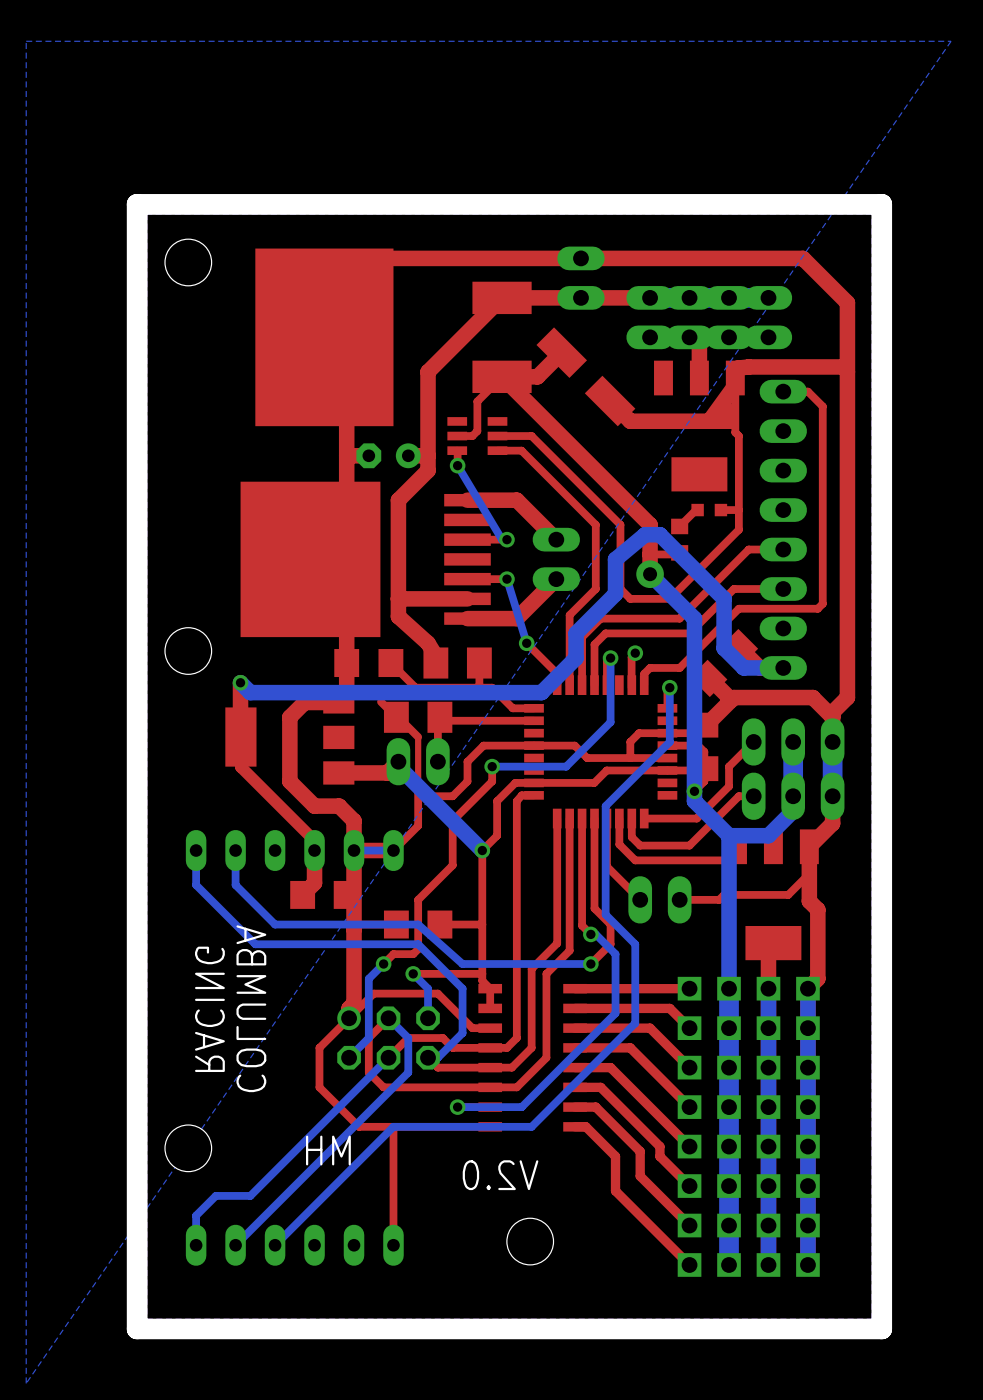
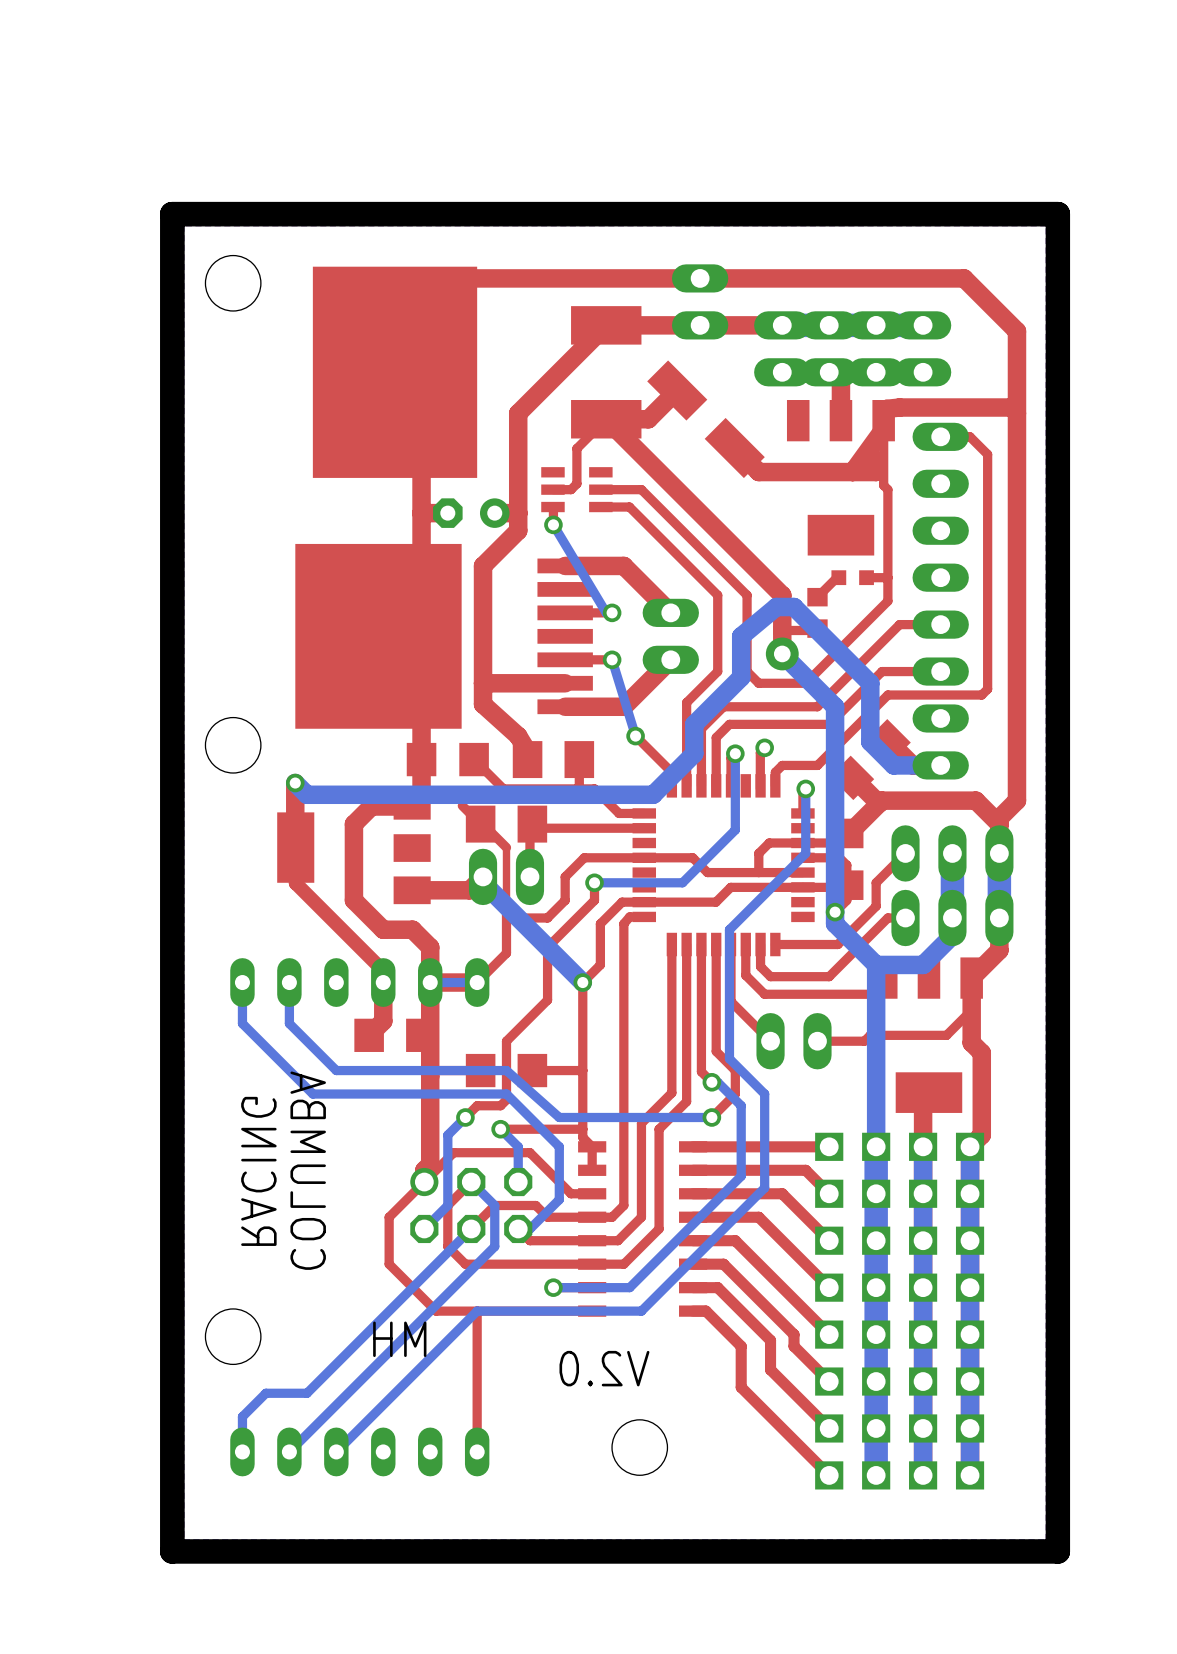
bottom zone outline: (951, 41) (26, 41) (26, 1383) (951, 41) -> none

